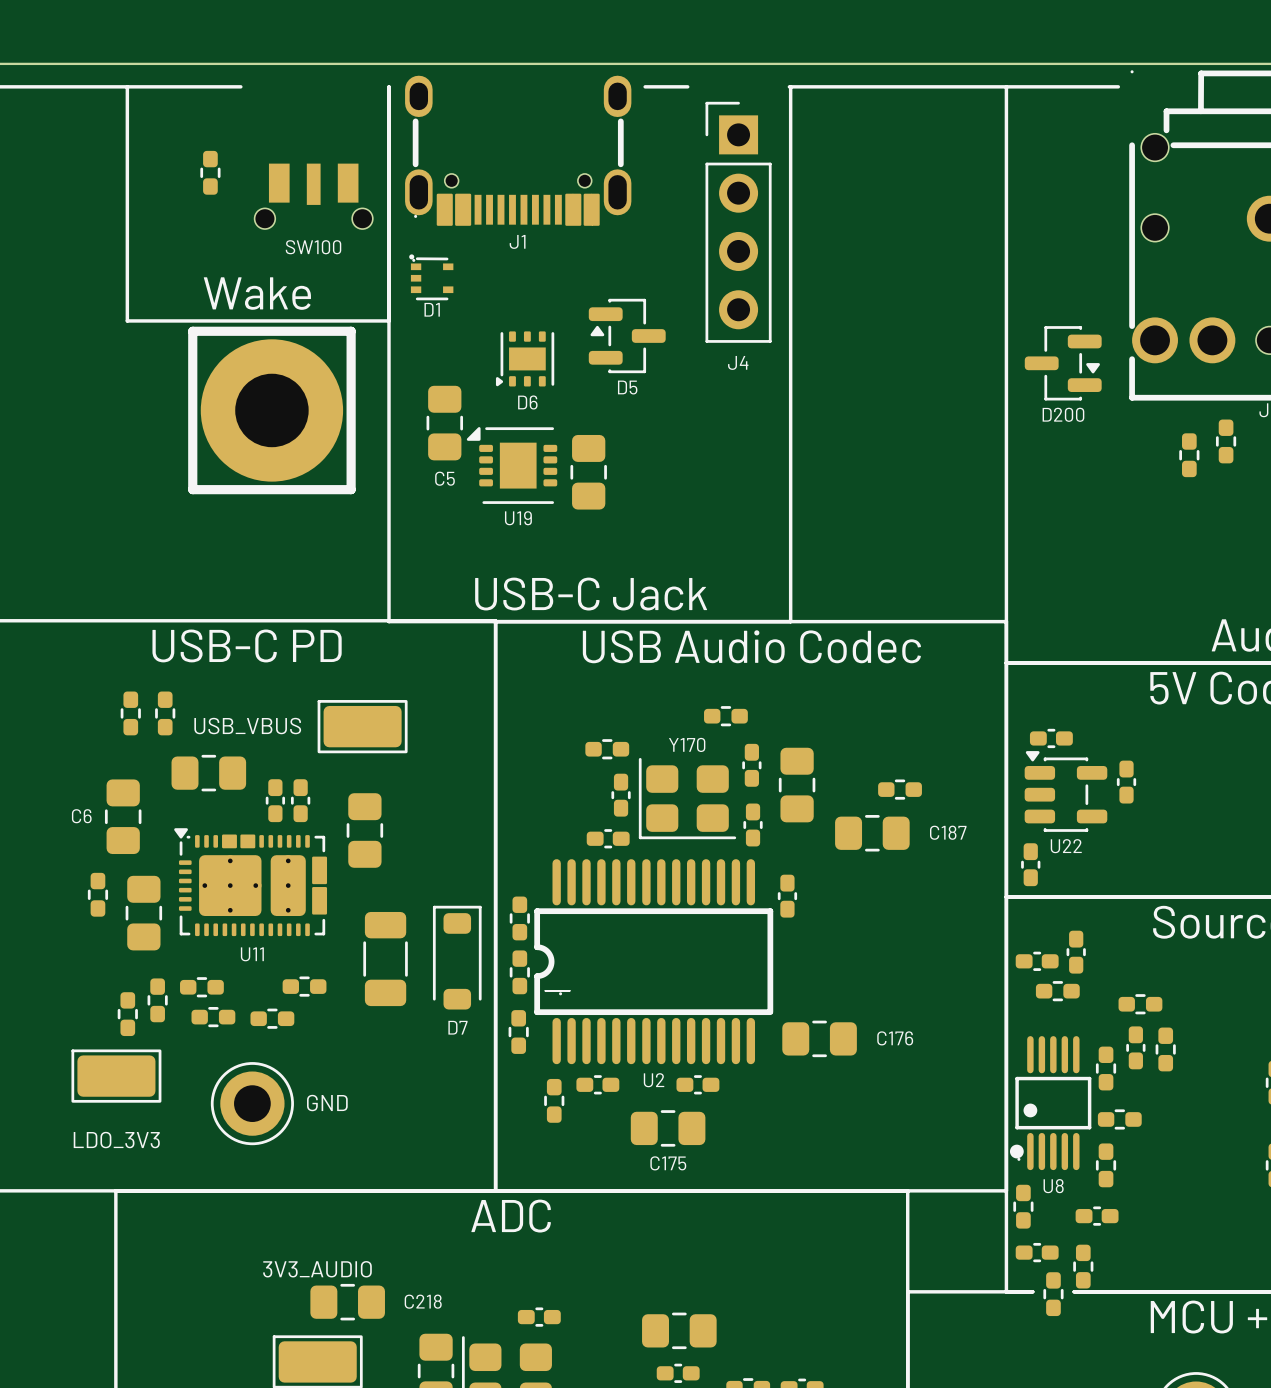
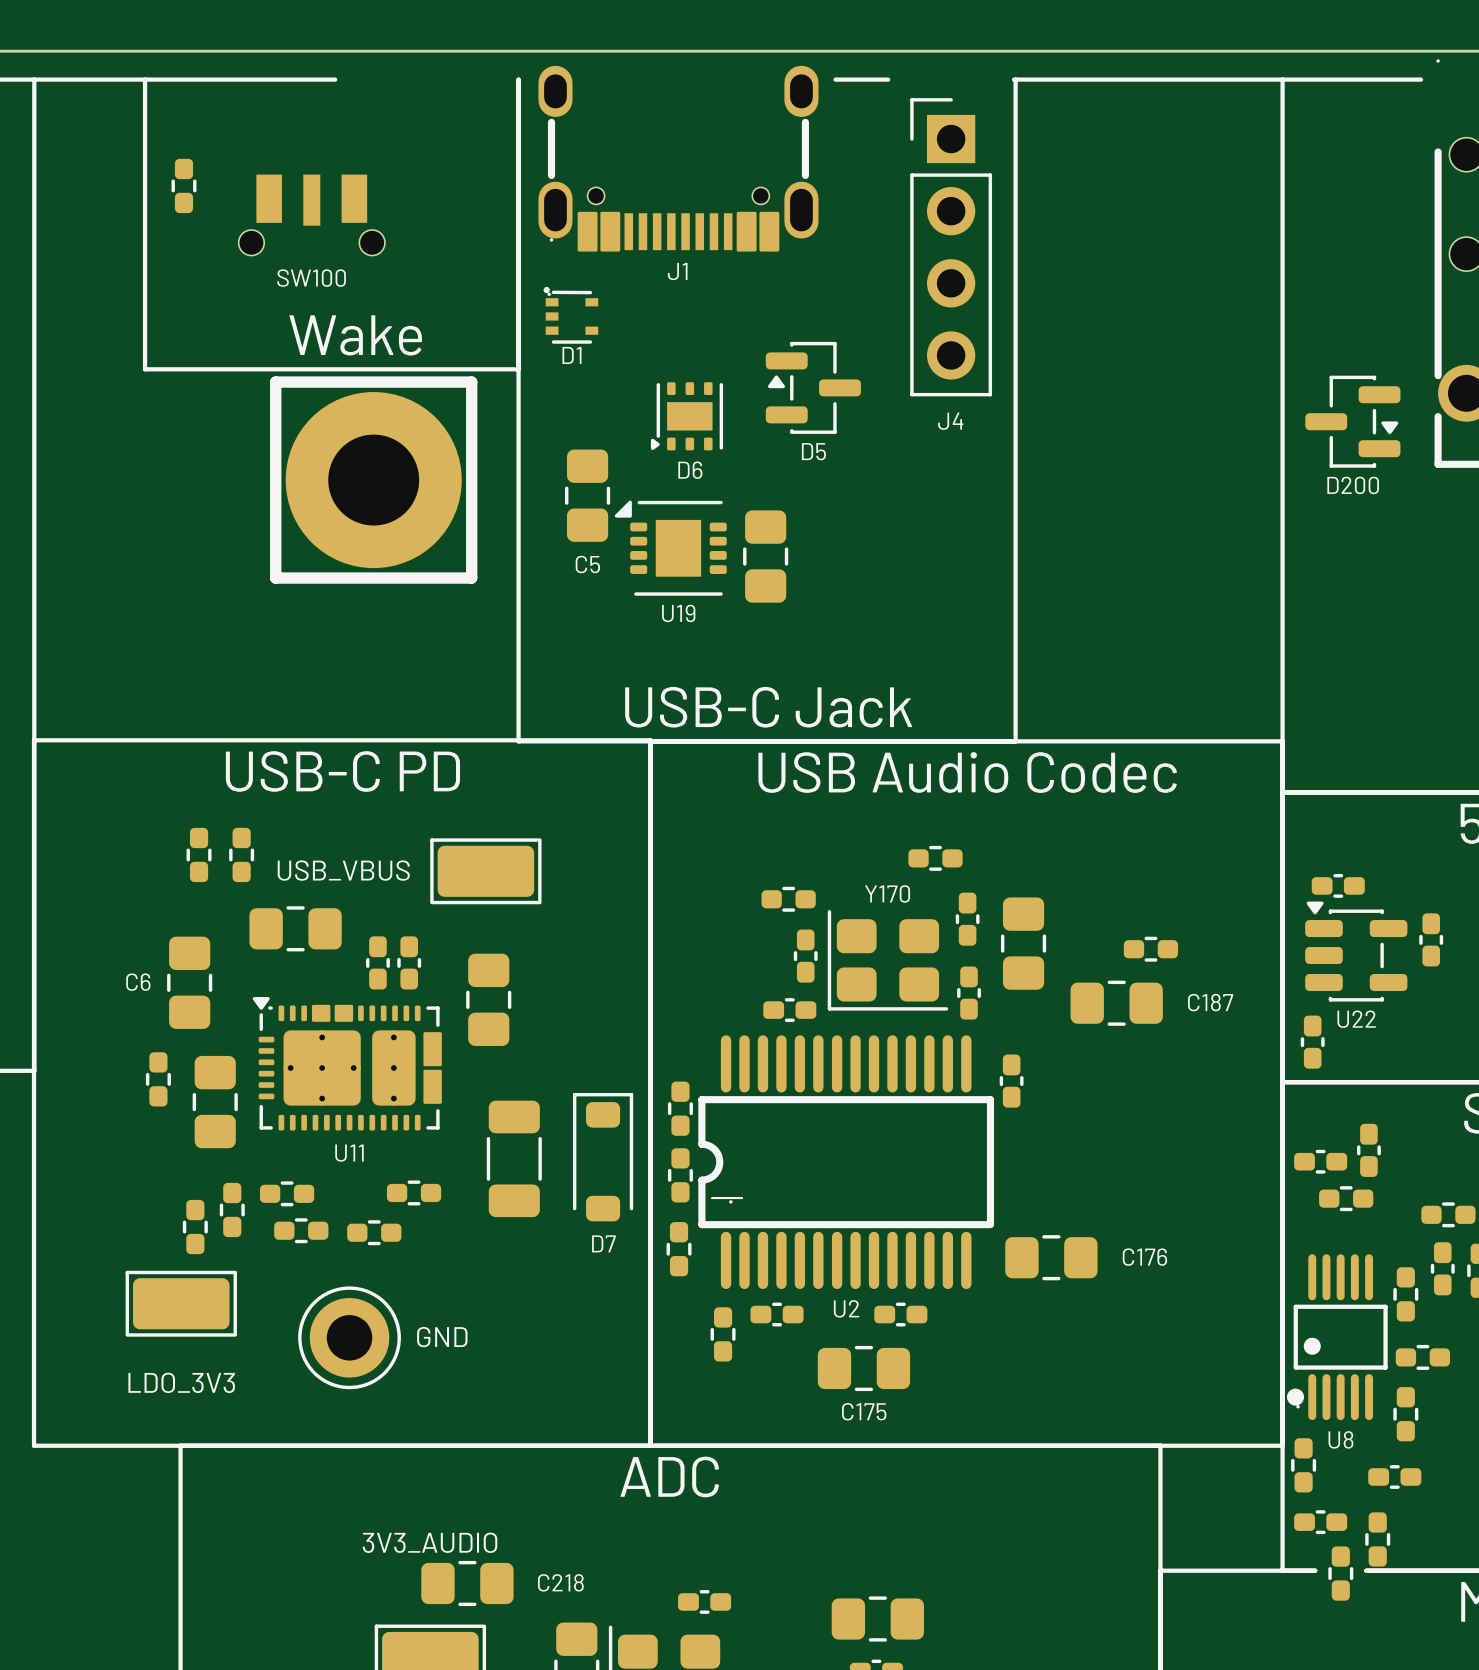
line: (127, 86) (127, 320) -> (145, 79) (145, 369) (194, 369)
part position: (210, 172) -> (183, 185)
SW100 position: (313, 196) -> (311, 215)

